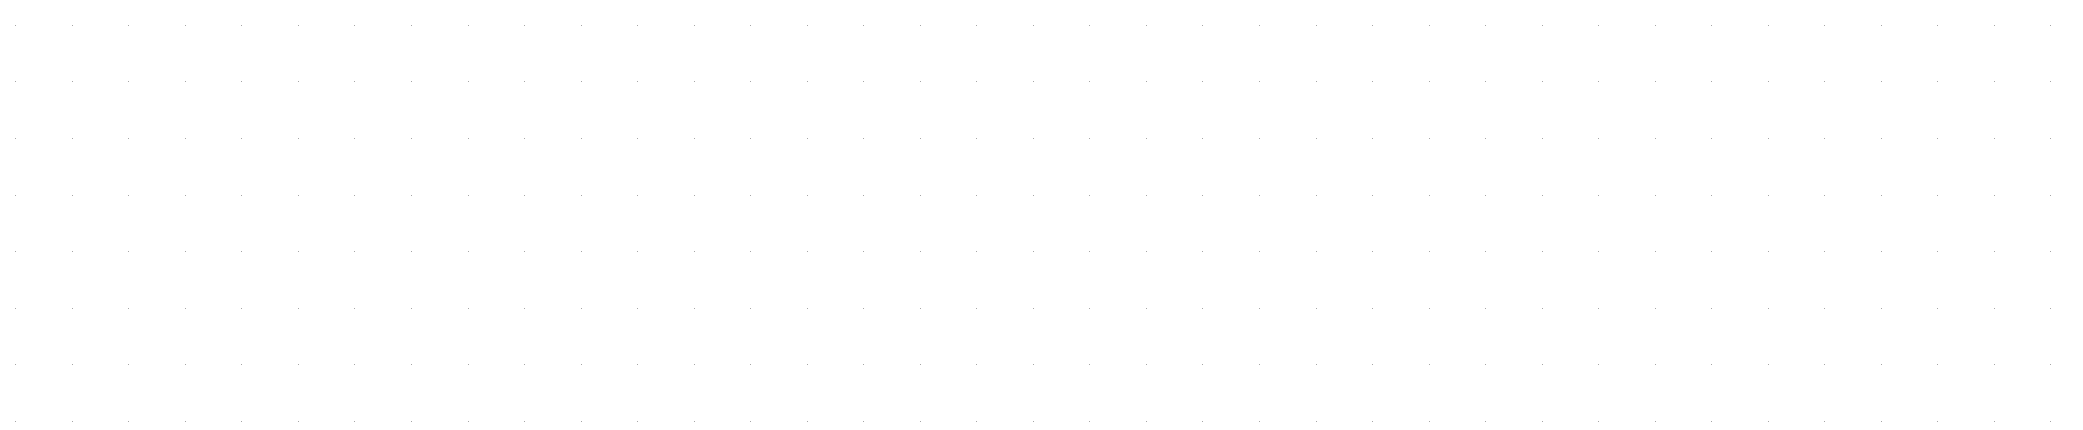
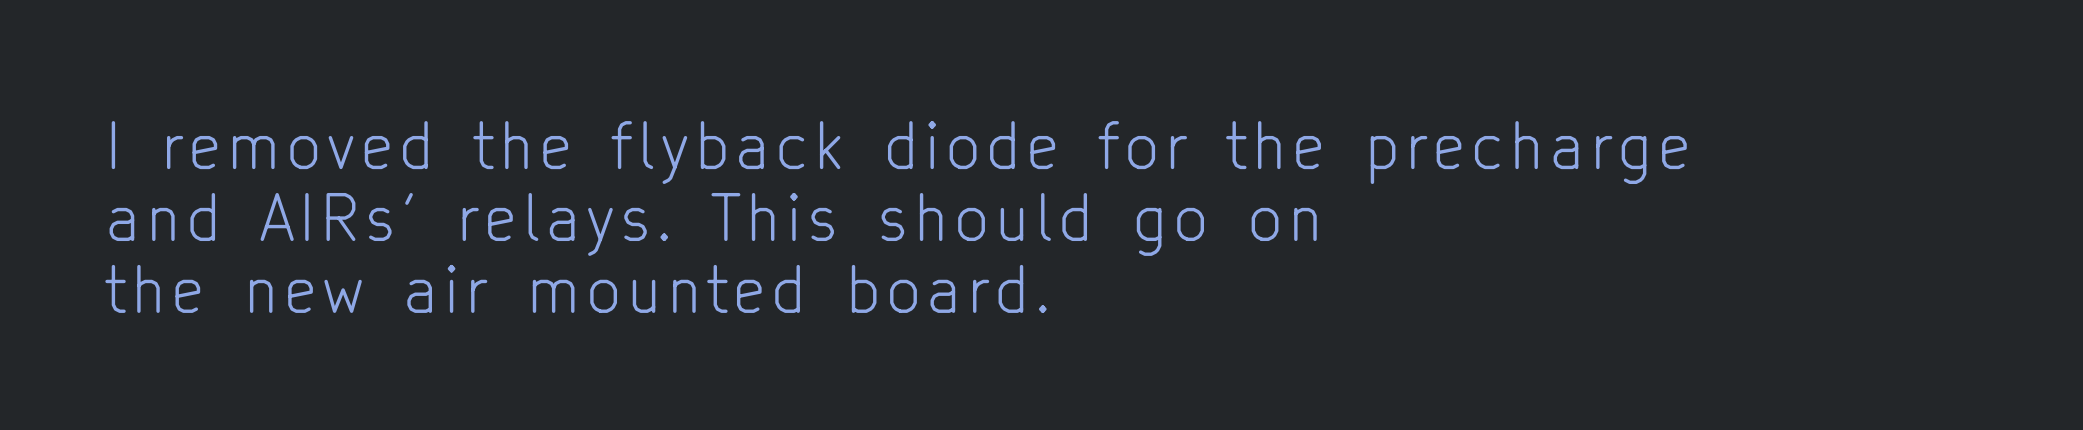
text: none -> I removed the flyback diode for the precharge (899, 152)
text: none -> and AIRs' relays. This should go on (713, 224)
text: none -> the new air mounted board. (575, 288)

